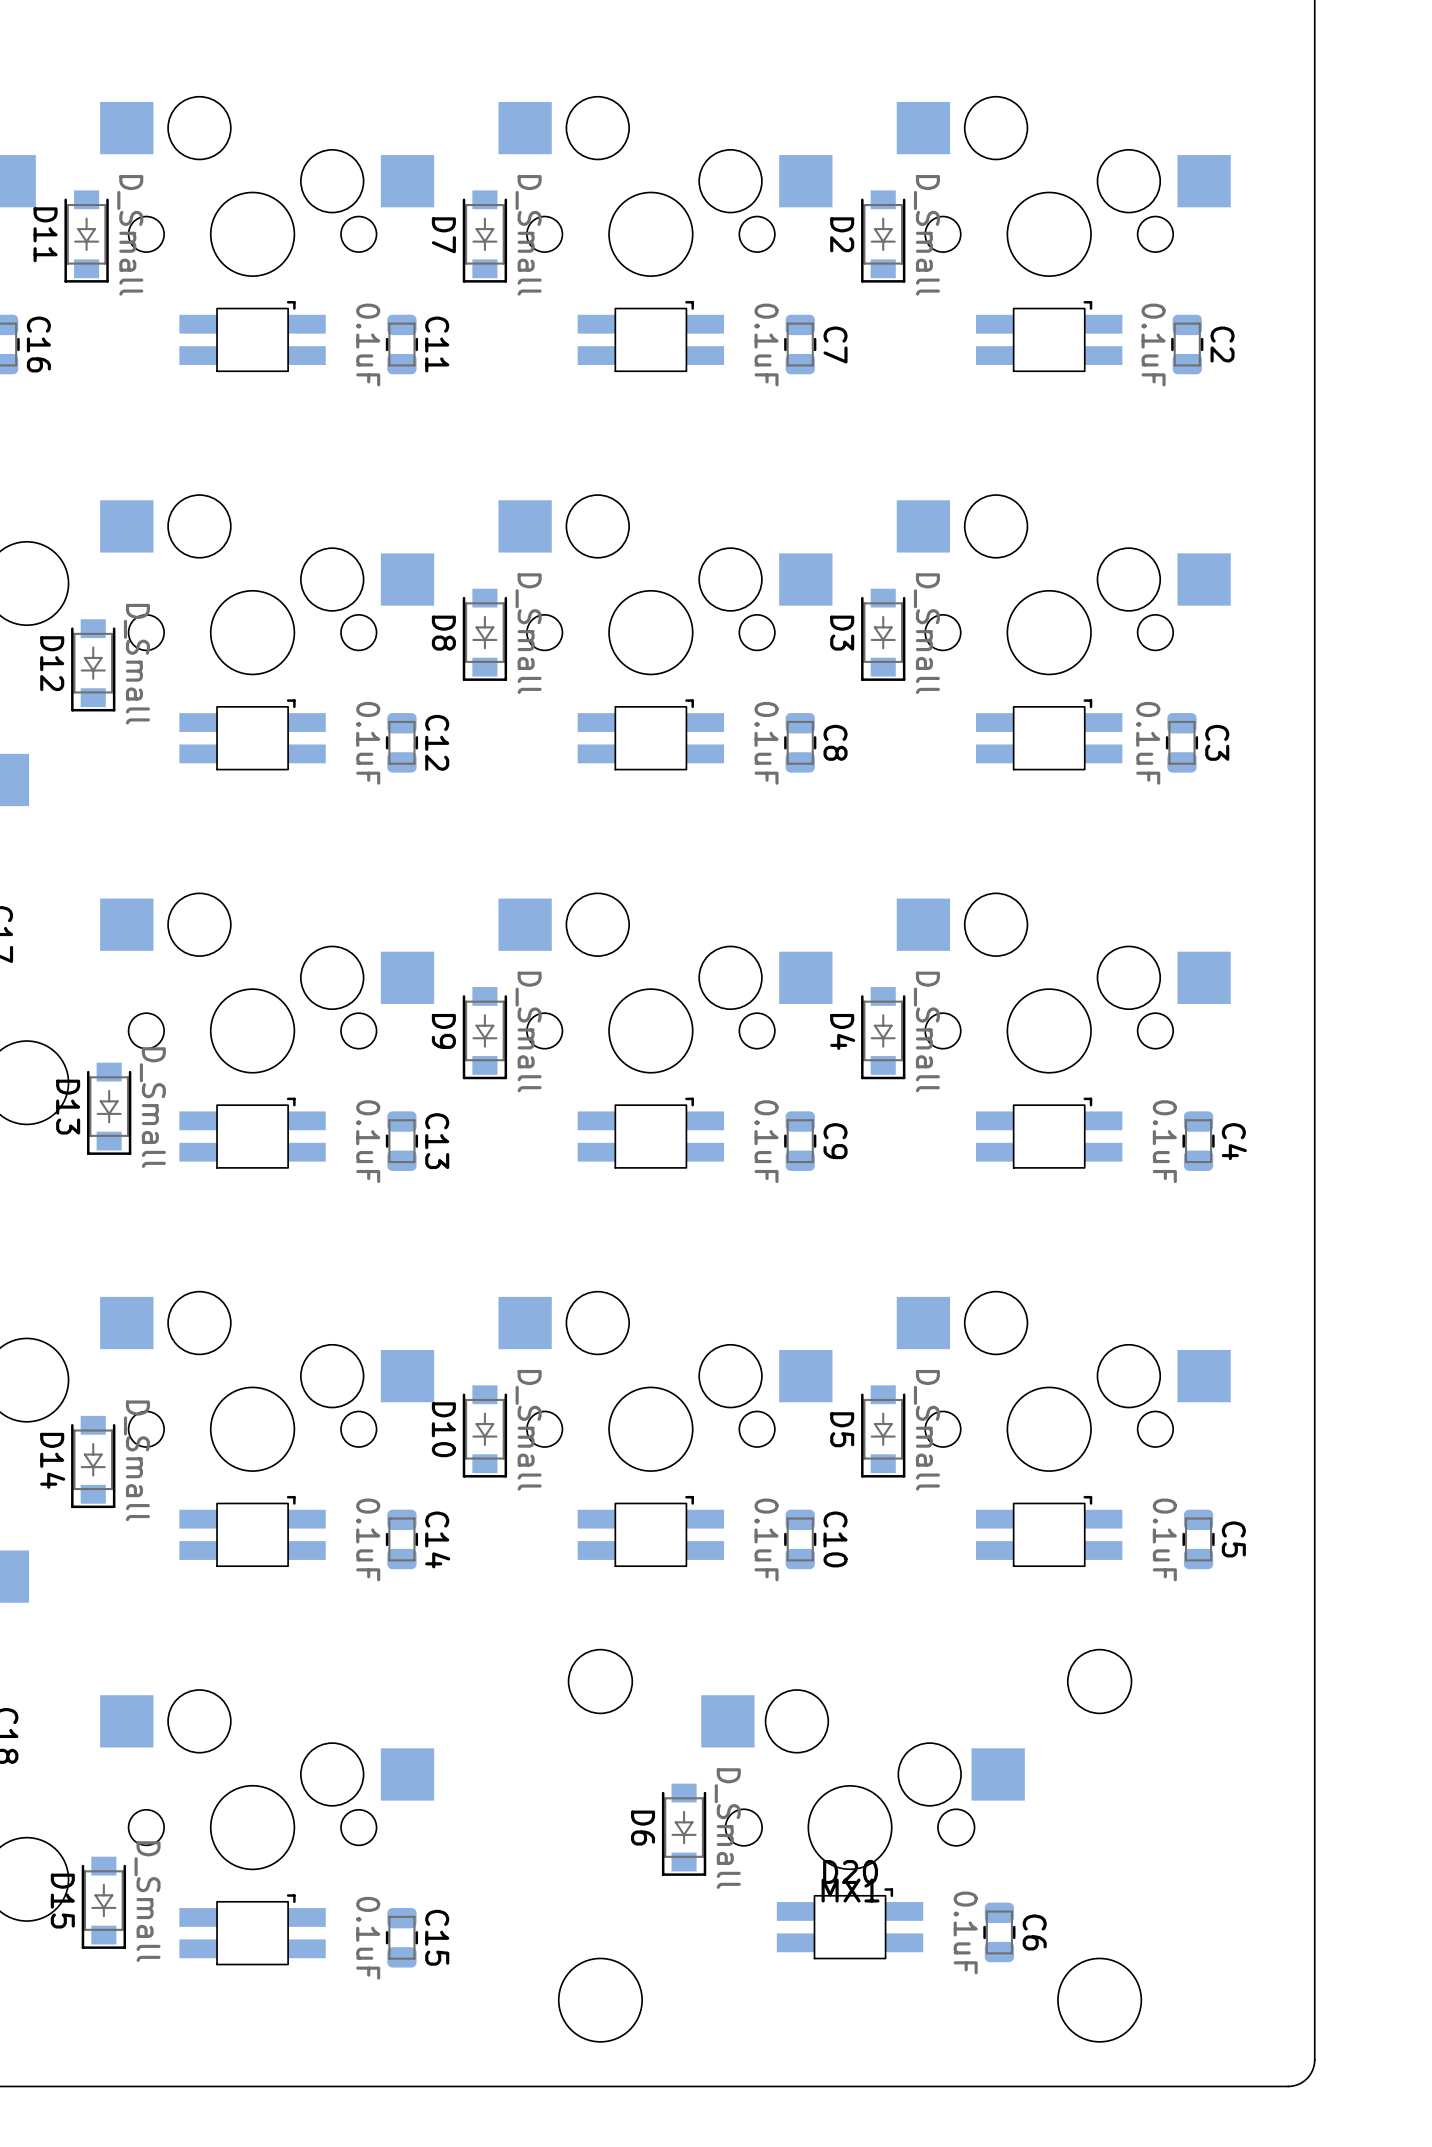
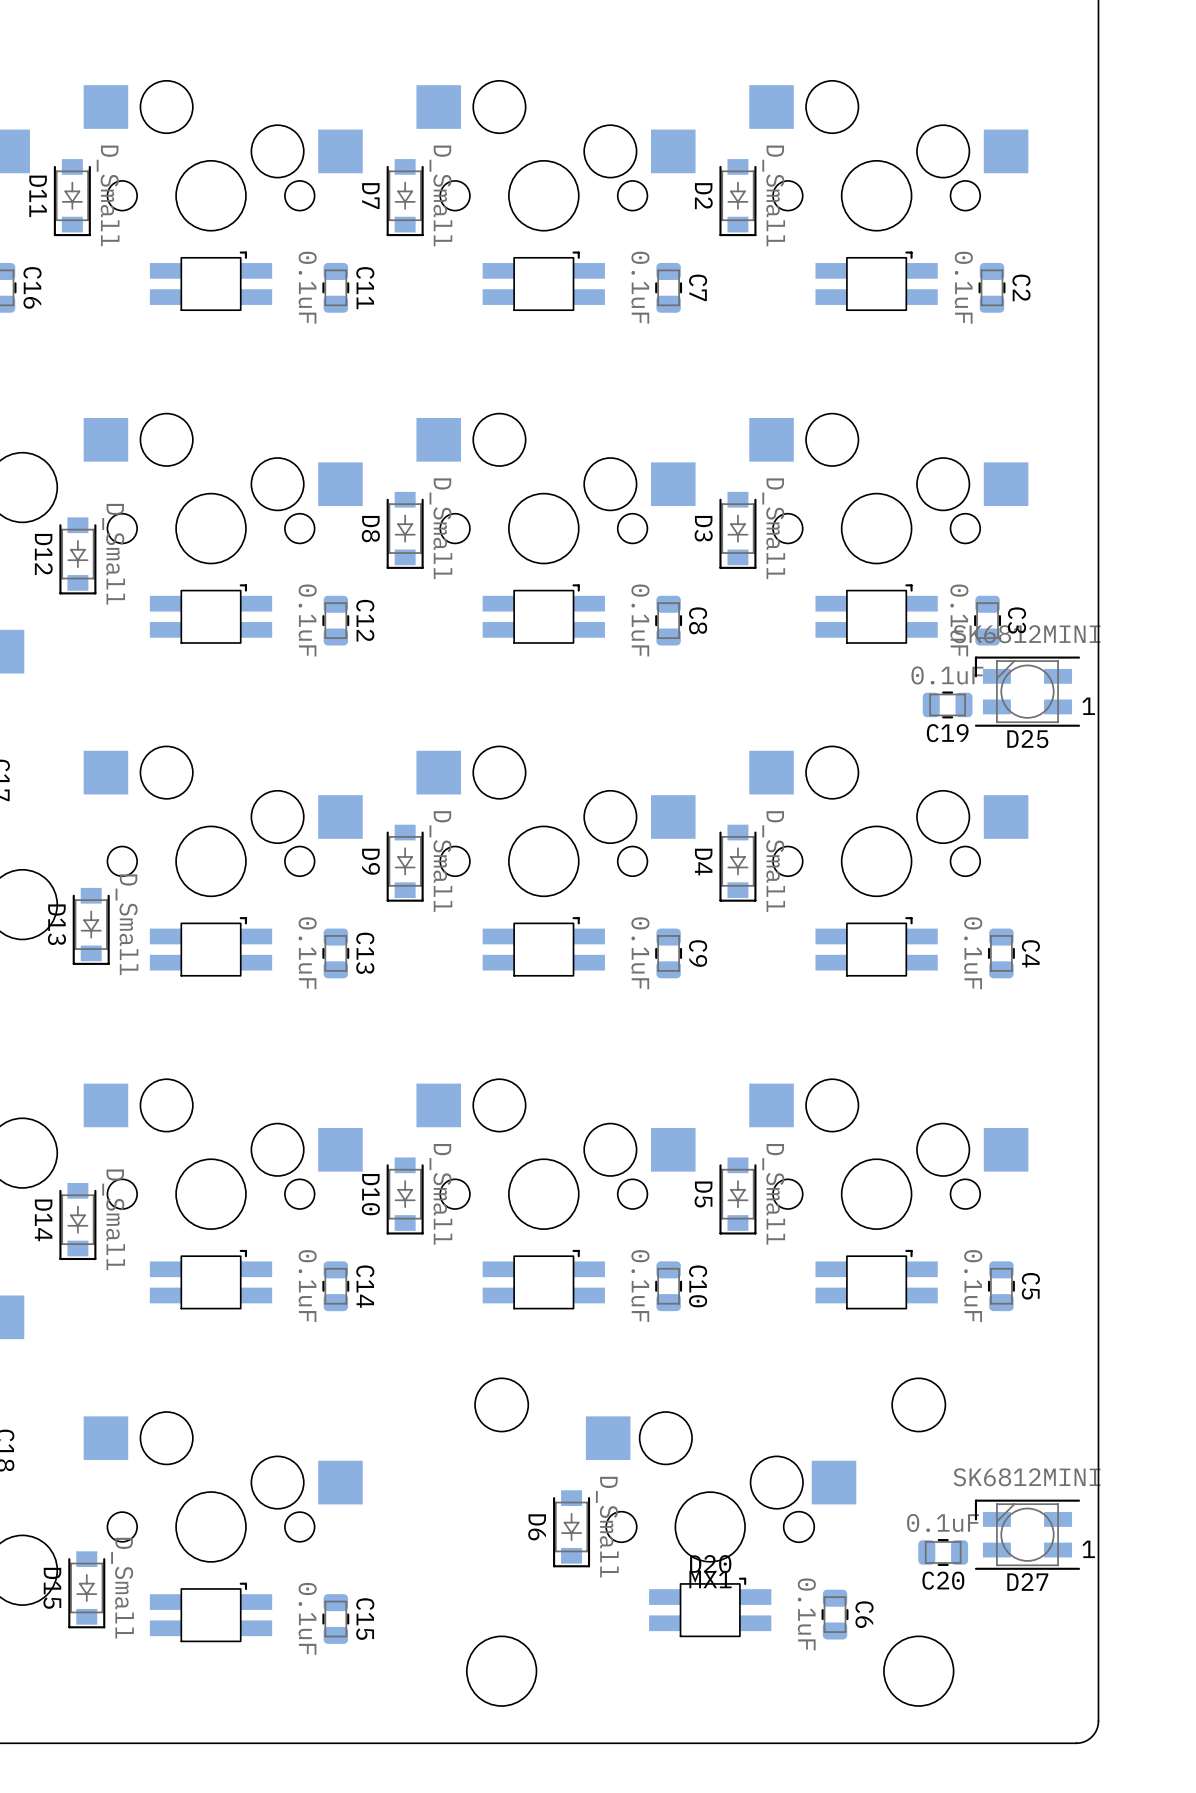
D25: none -> SK6812MINI (1027, 691)
C19: none -> 0.1uF (947, 704)
D27: none -> SK6812MINI (1027, 1534)
C20: none -> 0.1uF (943, 1552)

